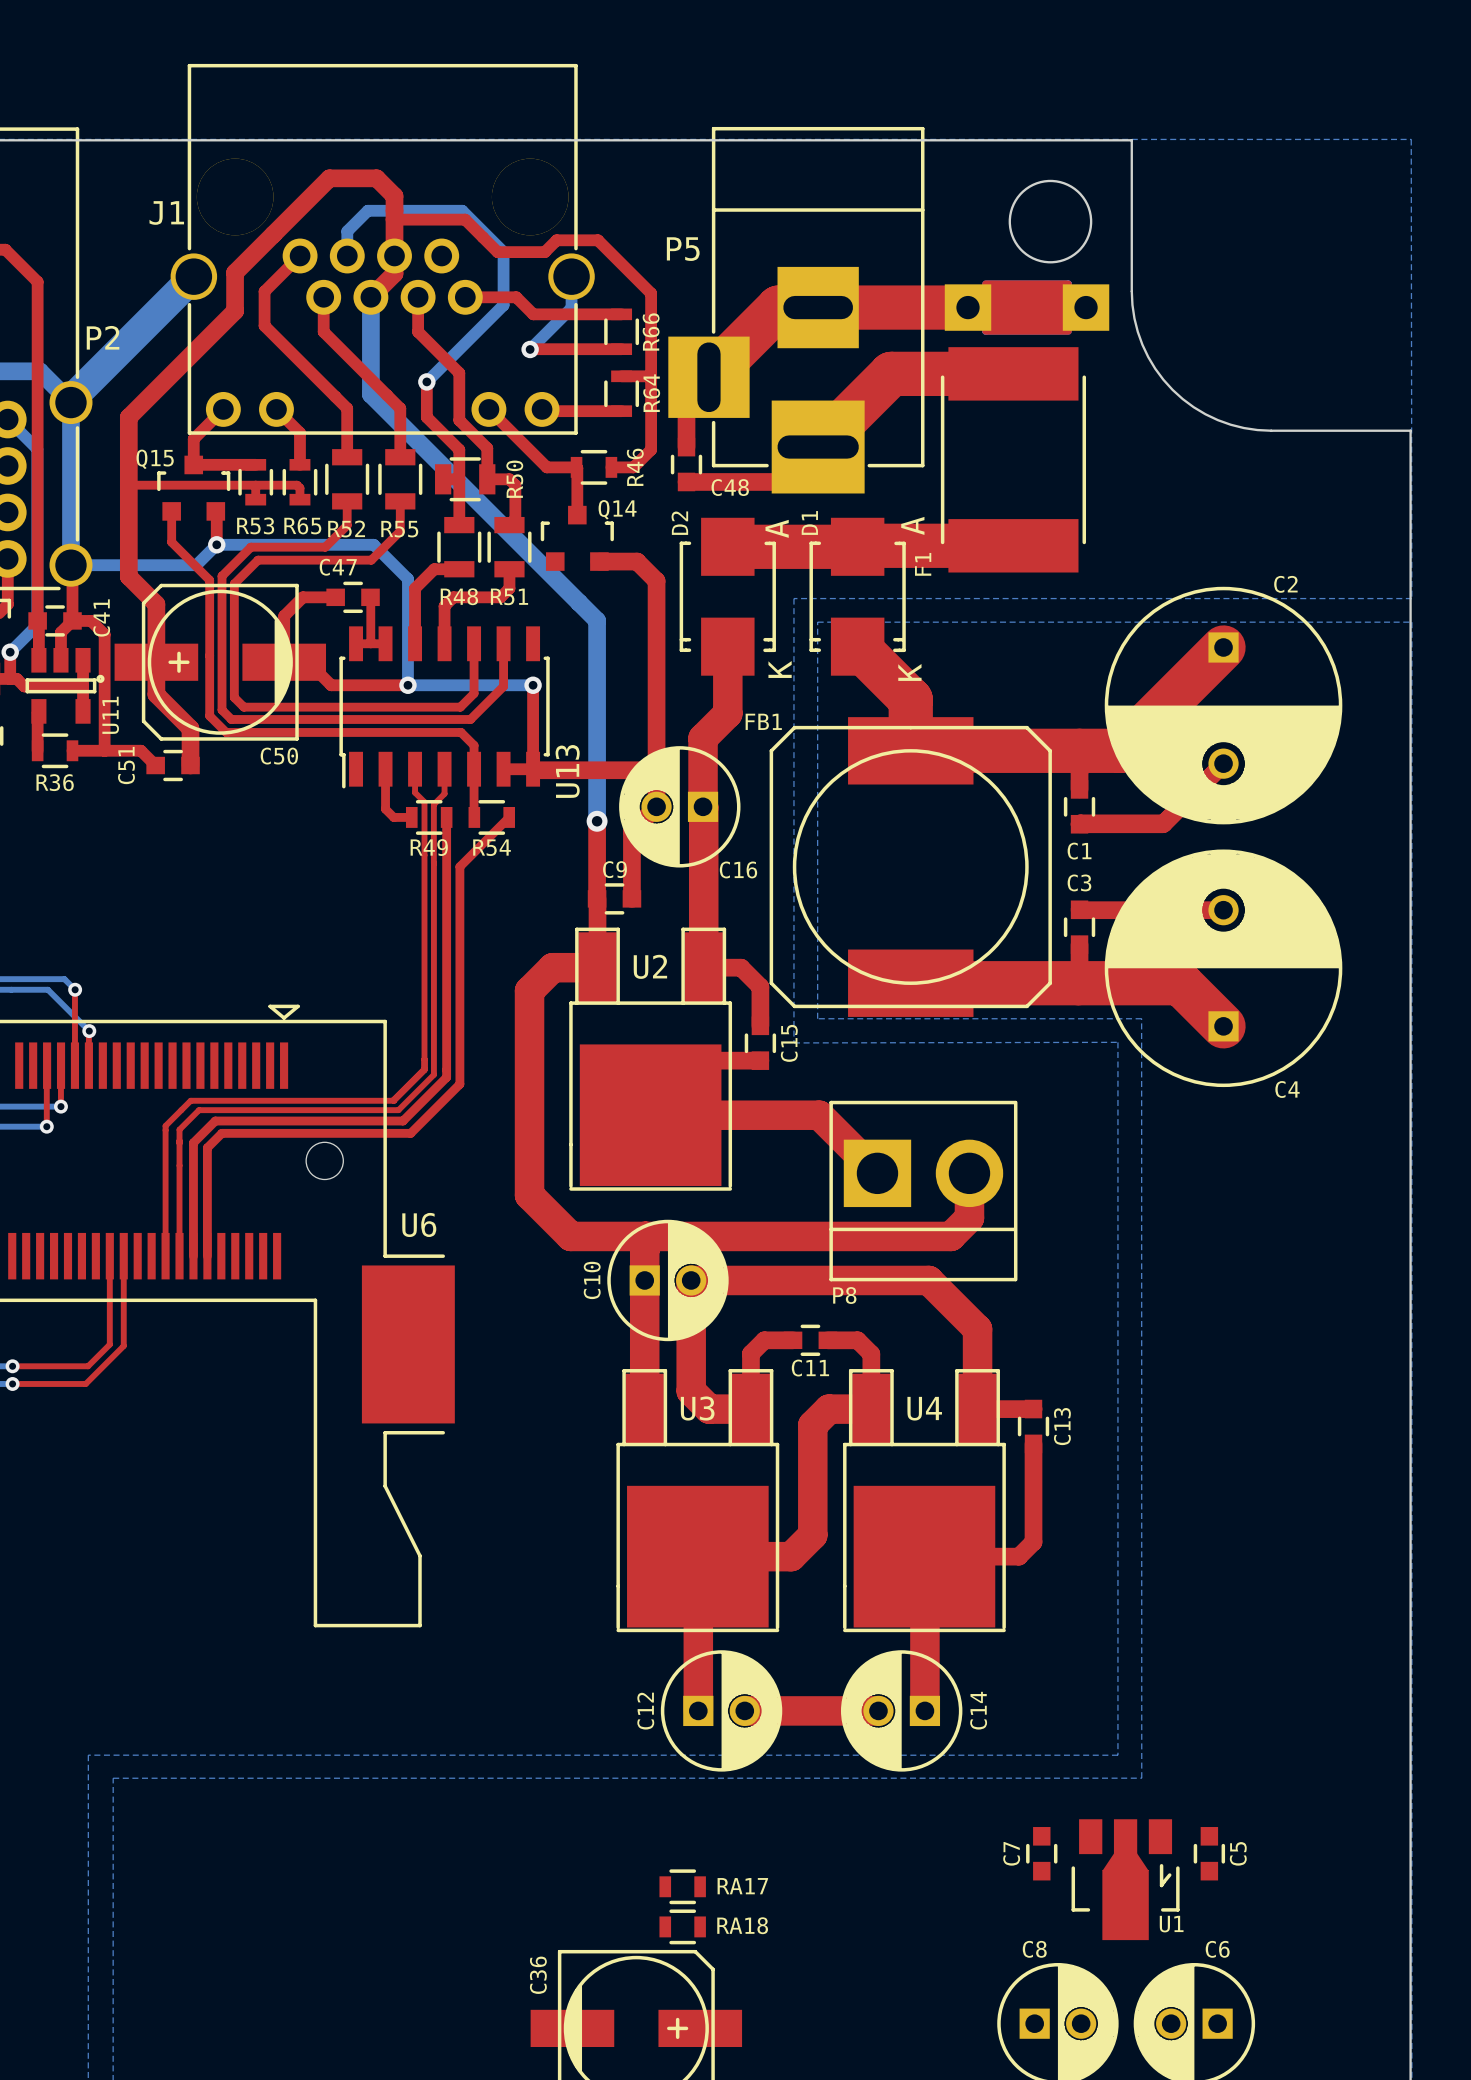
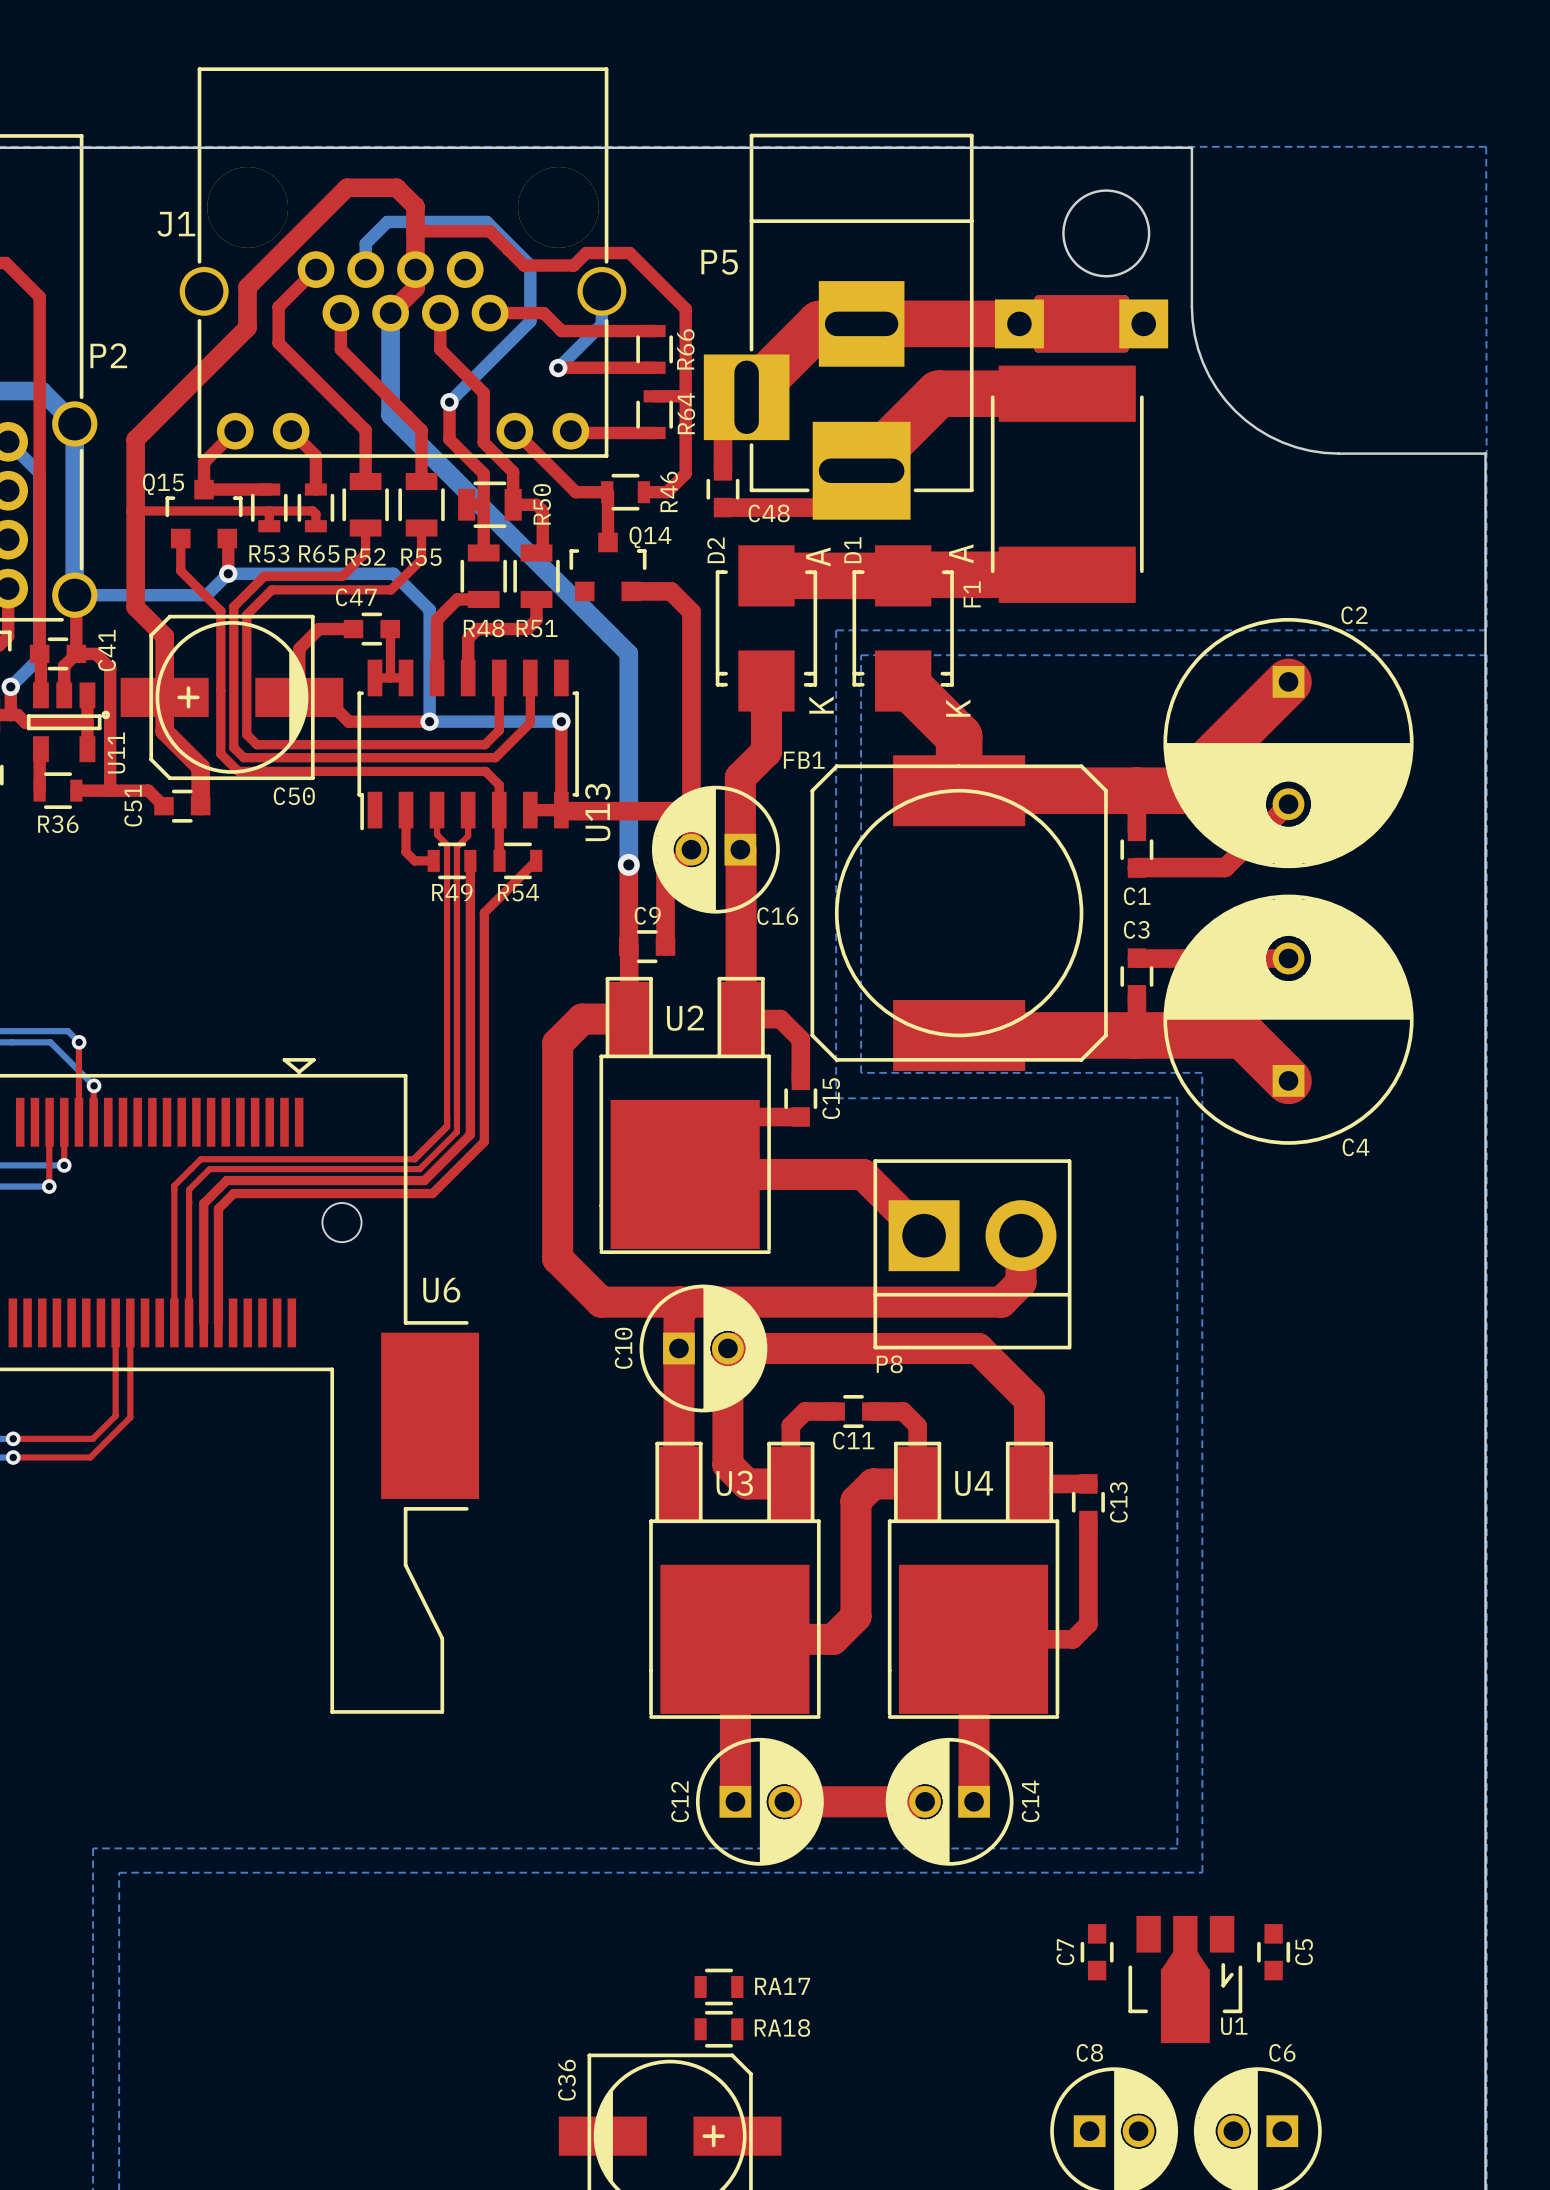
bottom track: (193, 276) (70, 399) (70, 402) -> none

